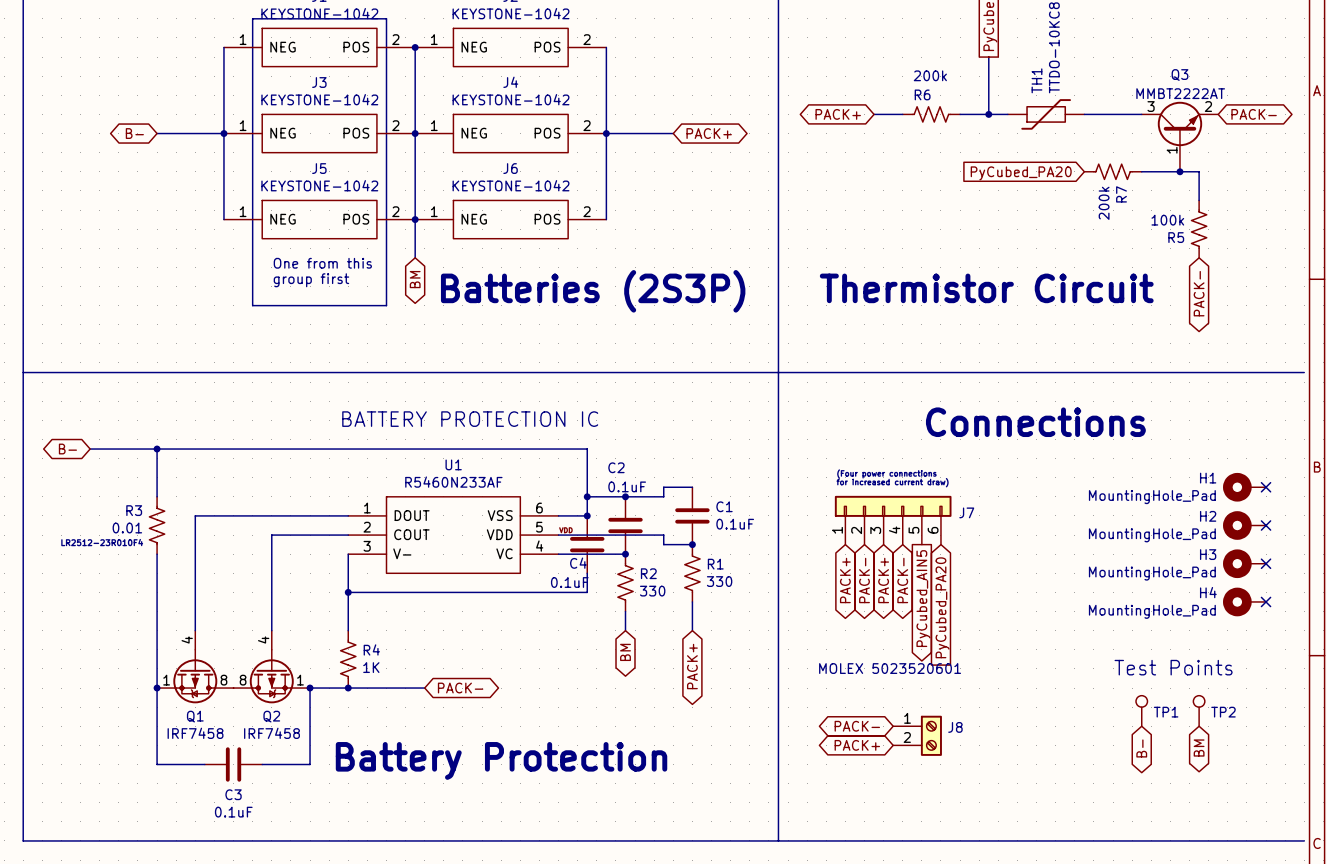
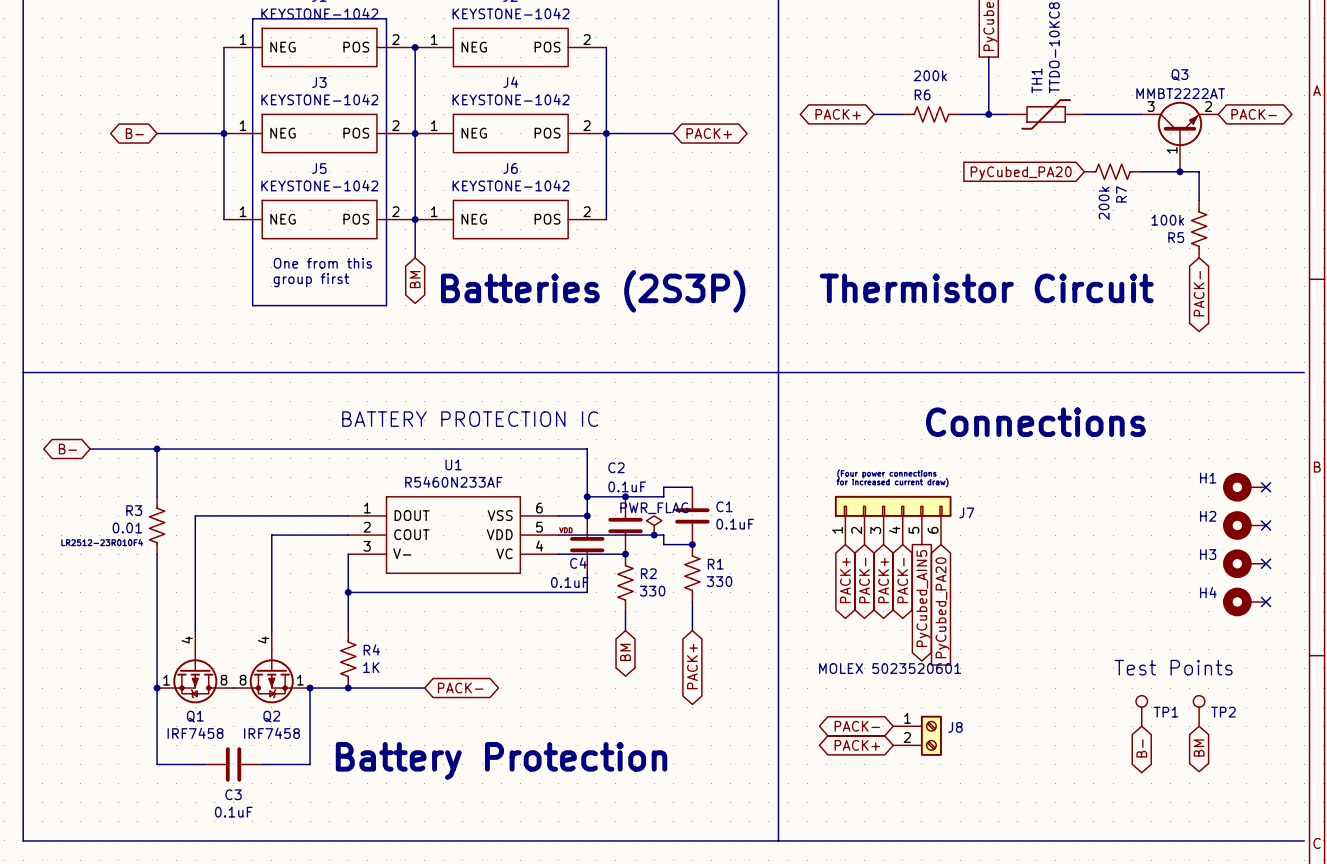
H1 value: MountingHole_Pad (1152, 497) -> none
power symbol: none -> PWR_FLAG (654, 525)
junction: none -> (654, 535)
H2 value: MountingHole_Pad (1152, 535) -> none
H3 value: MountingHole_Pad (1152, 573) -> none
H4 value: MountingHole_Pad (1152, 611) -> none

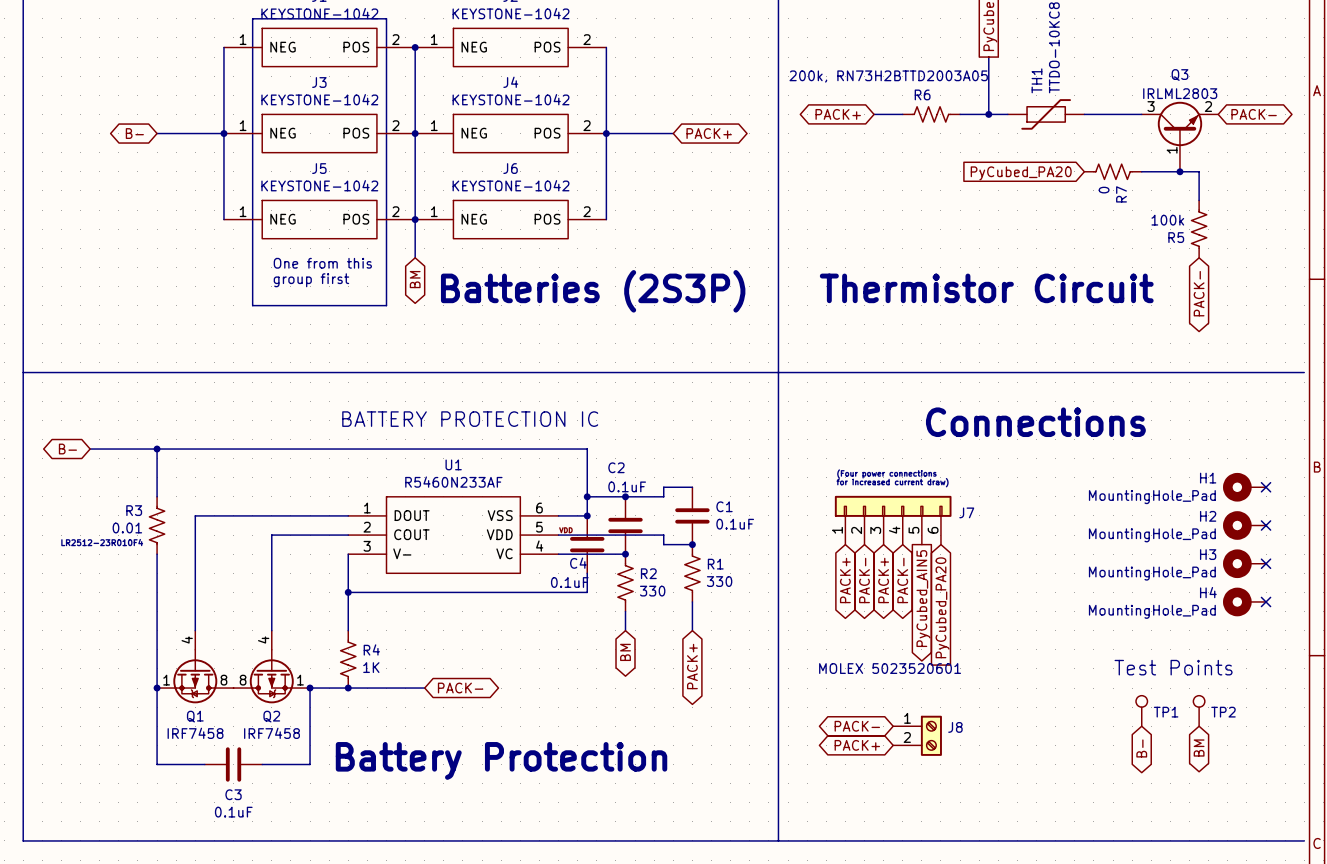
R6 value: 200k (930, 75) -> 200k, RN73H2BTTD2003A05 (888, 76)
Q3 value: MMBT2222AT (1180, 93) -> IRLML2803 (1180, 93)
R7 value: 200k (1104, 203) -> 0 (1104, 190)
H1 value: none -> MountingHole_Pad (1152, 497)
power symbol: PWR_FLAG (654, 525) -> none
junction: (654, 535) -> none
H2 value: none -> MountingHole_Pad (1152, 535)
H3 value: none -> MountingHole_Pad (1152, 573)
H4 value: none -> MountingHole_Pad (1152, 611)

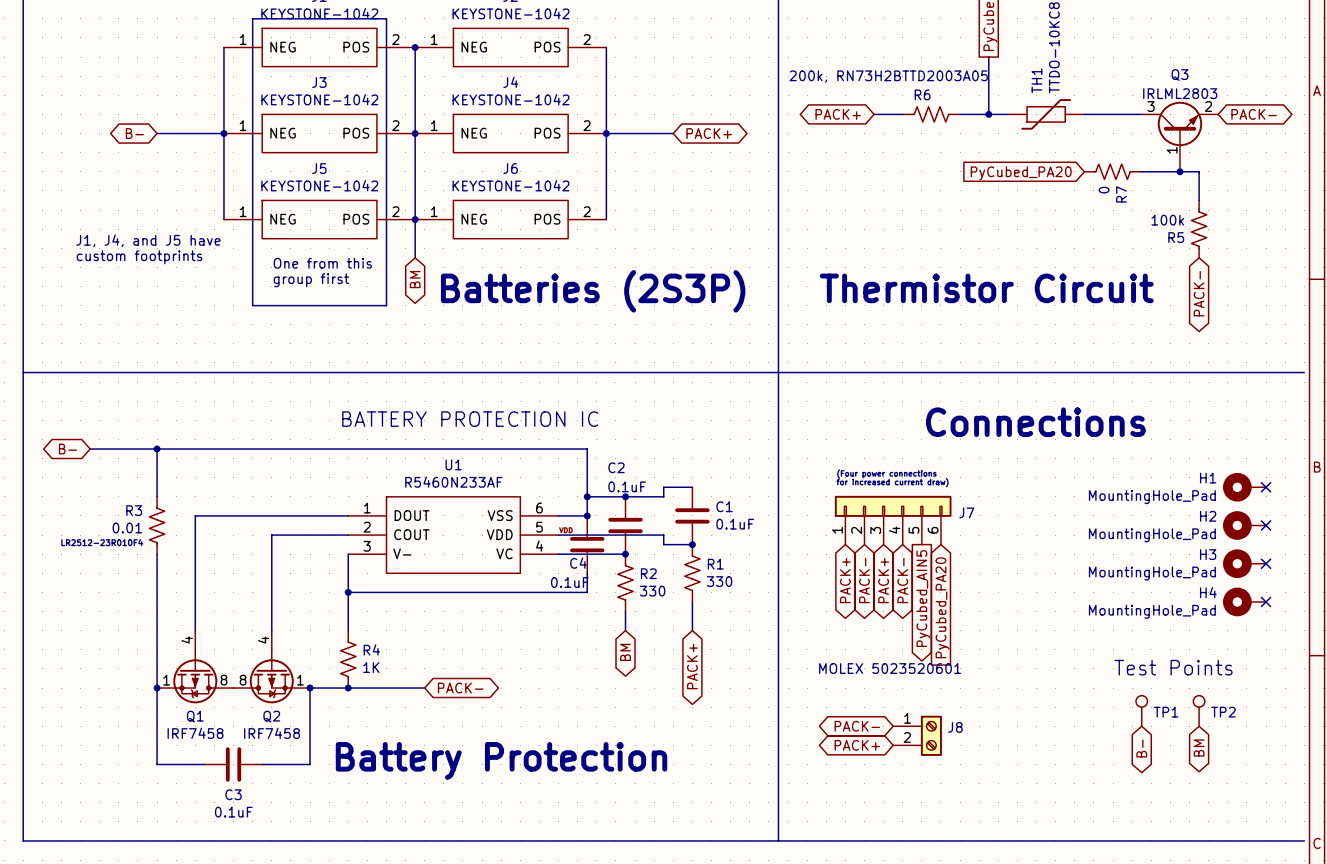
text: none -> J1, J4, and J5 have (148, 240)
text: none -> custom footprints (139, 257)

